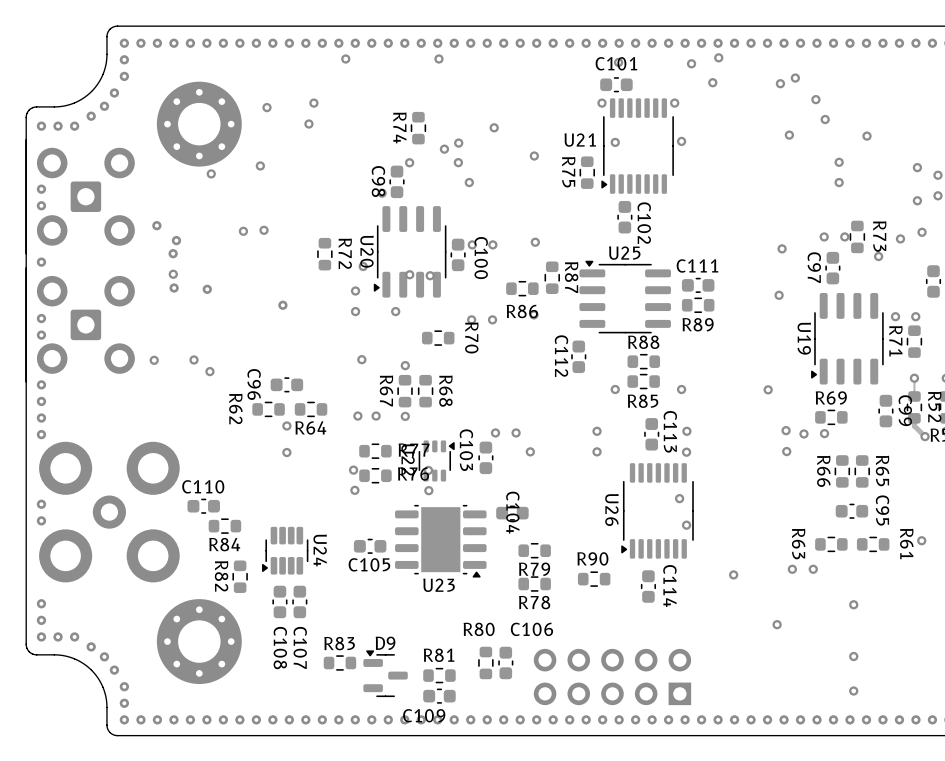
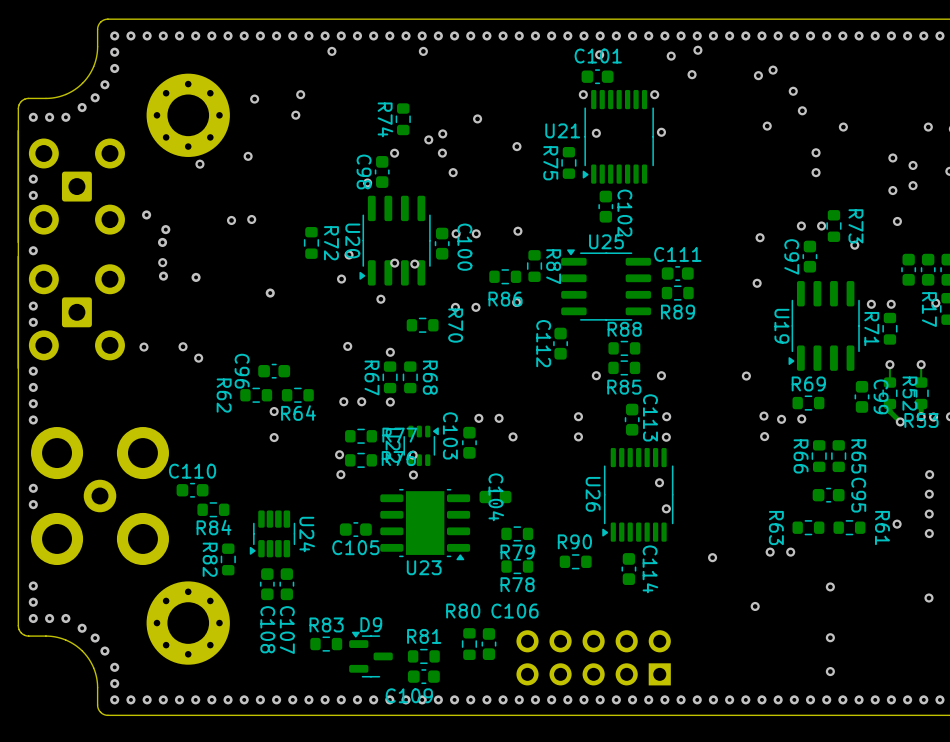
via: (900, 238) -> none
via: (355, 311) -> none

